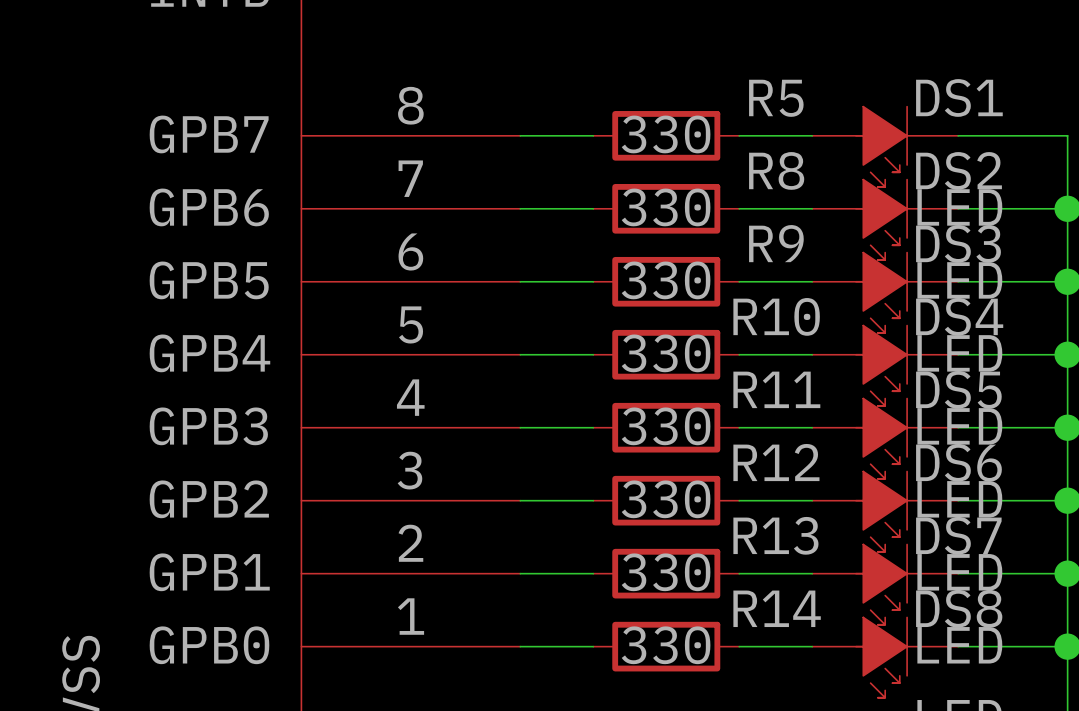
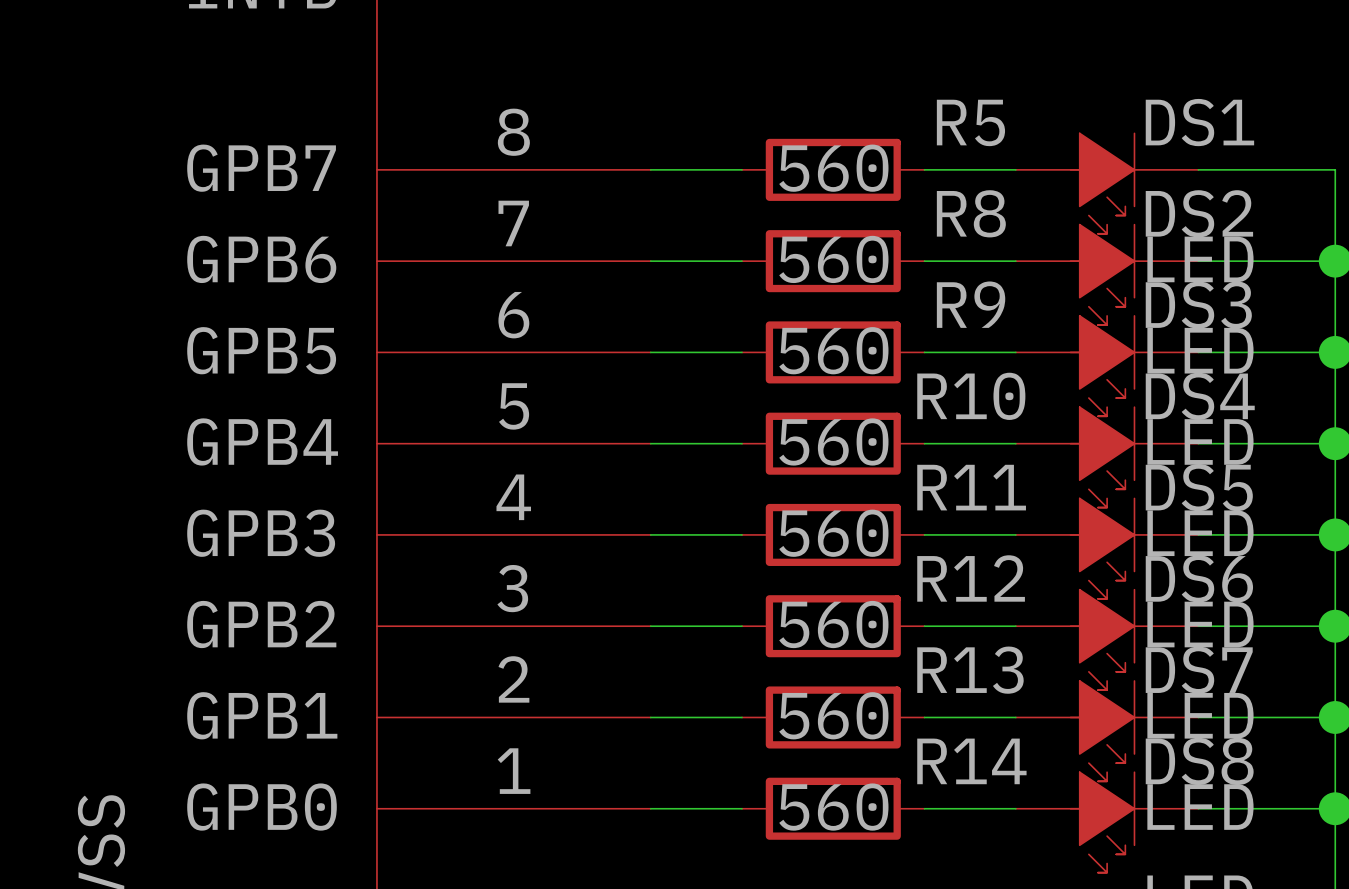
R5 value: 330 (666, 134) -> 560 (833, 168)
R8 value: 330 (666, 207) -> 560 (833, 259)
R9 value: 330 (666, 280) -> 560 (833, 350)
R10 value: 330 (666, 353) -> 560 (833, 441)
R11 value: 330 (666, 426) -> 560 (833, 533)
R12 value: 330 (666, 499) -> 560 (833, 624)
R13 value: 330 (666, 572) -> 560 (833, 715)
R14 value: 330 (666, 645) -> 560 (833, 807)

